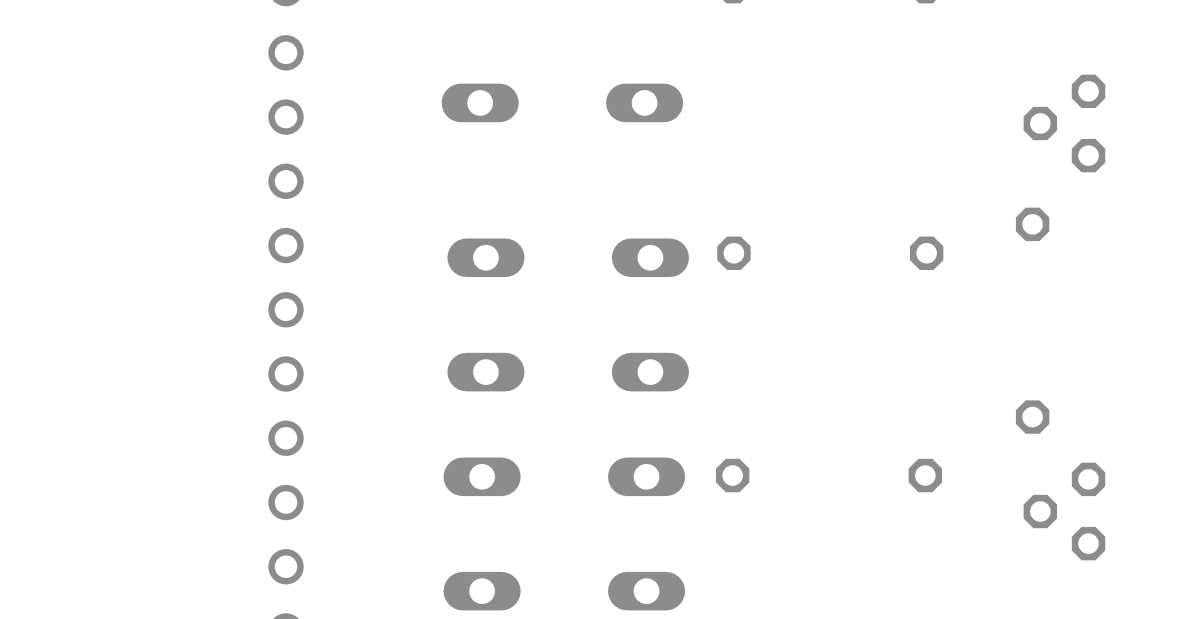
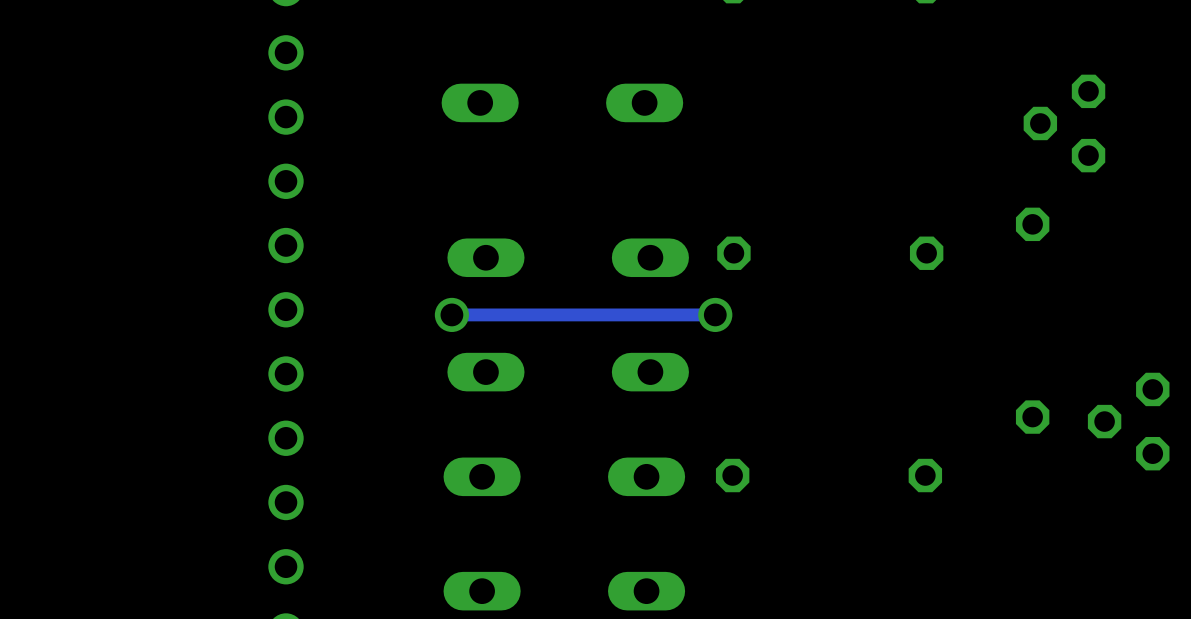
via: none -> (451, 314)
track: none -> (715, 314) (451, 314)
via: none -> (715, 314)
part position: (1064, 511) -> (1128, 421)

